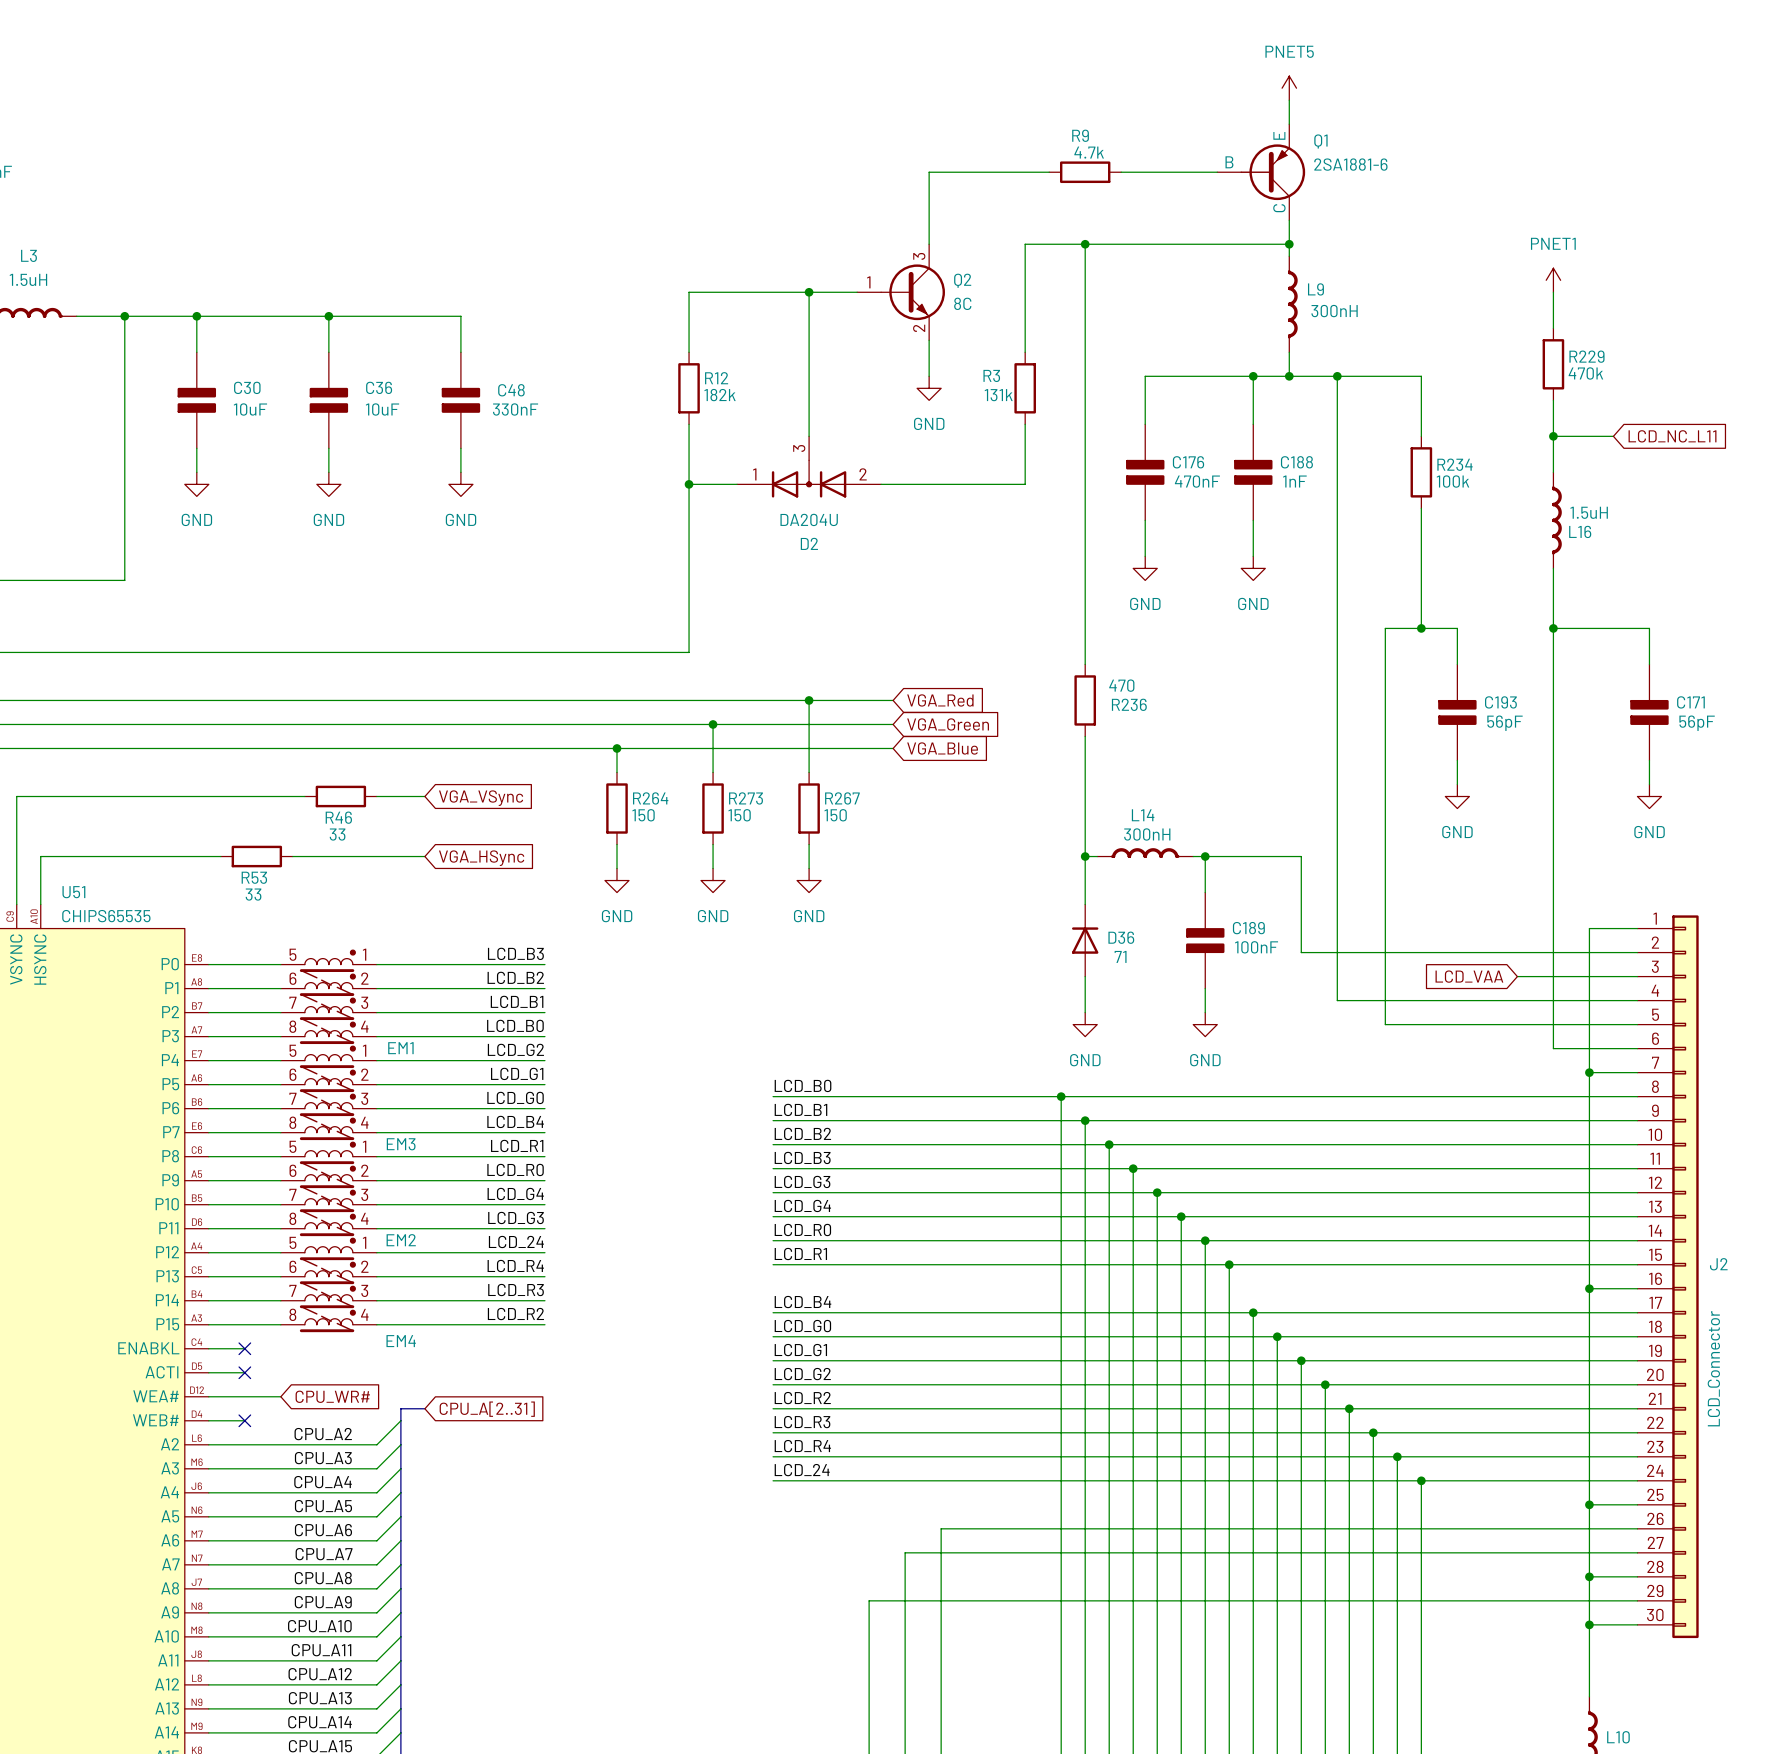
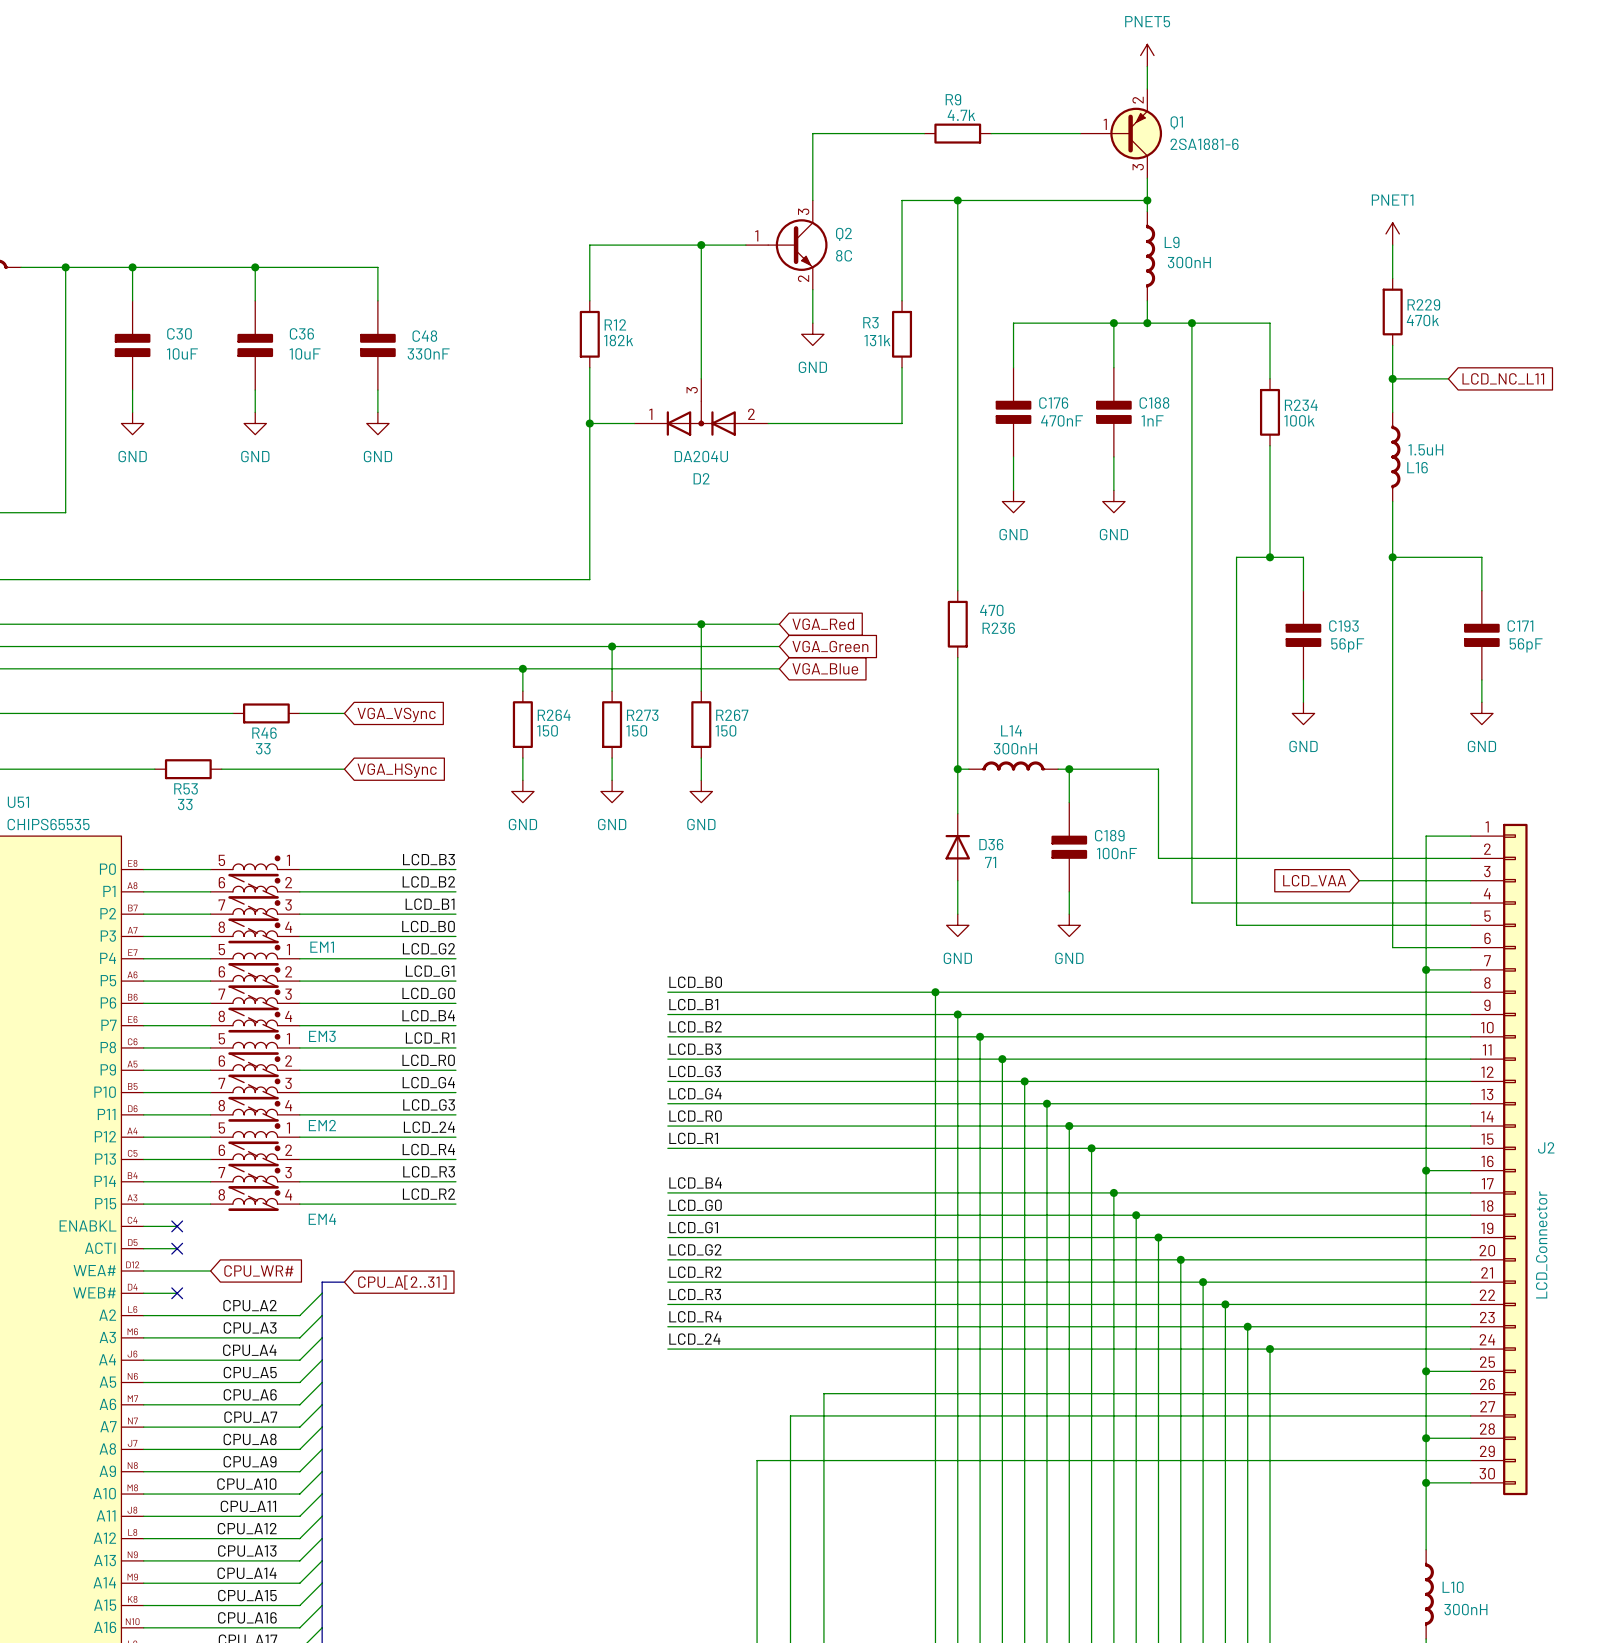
Q1 symbol: [1217, 124, 1306, 221] -> [1080, 88, 1163, 179]
Q1 name position: Q1 (1320, 141) -> Q1 (1176, 122)
Q1 value position: 2SA1881-6 (1350, 164) -> 2SA1881-6 (1204, 144)

